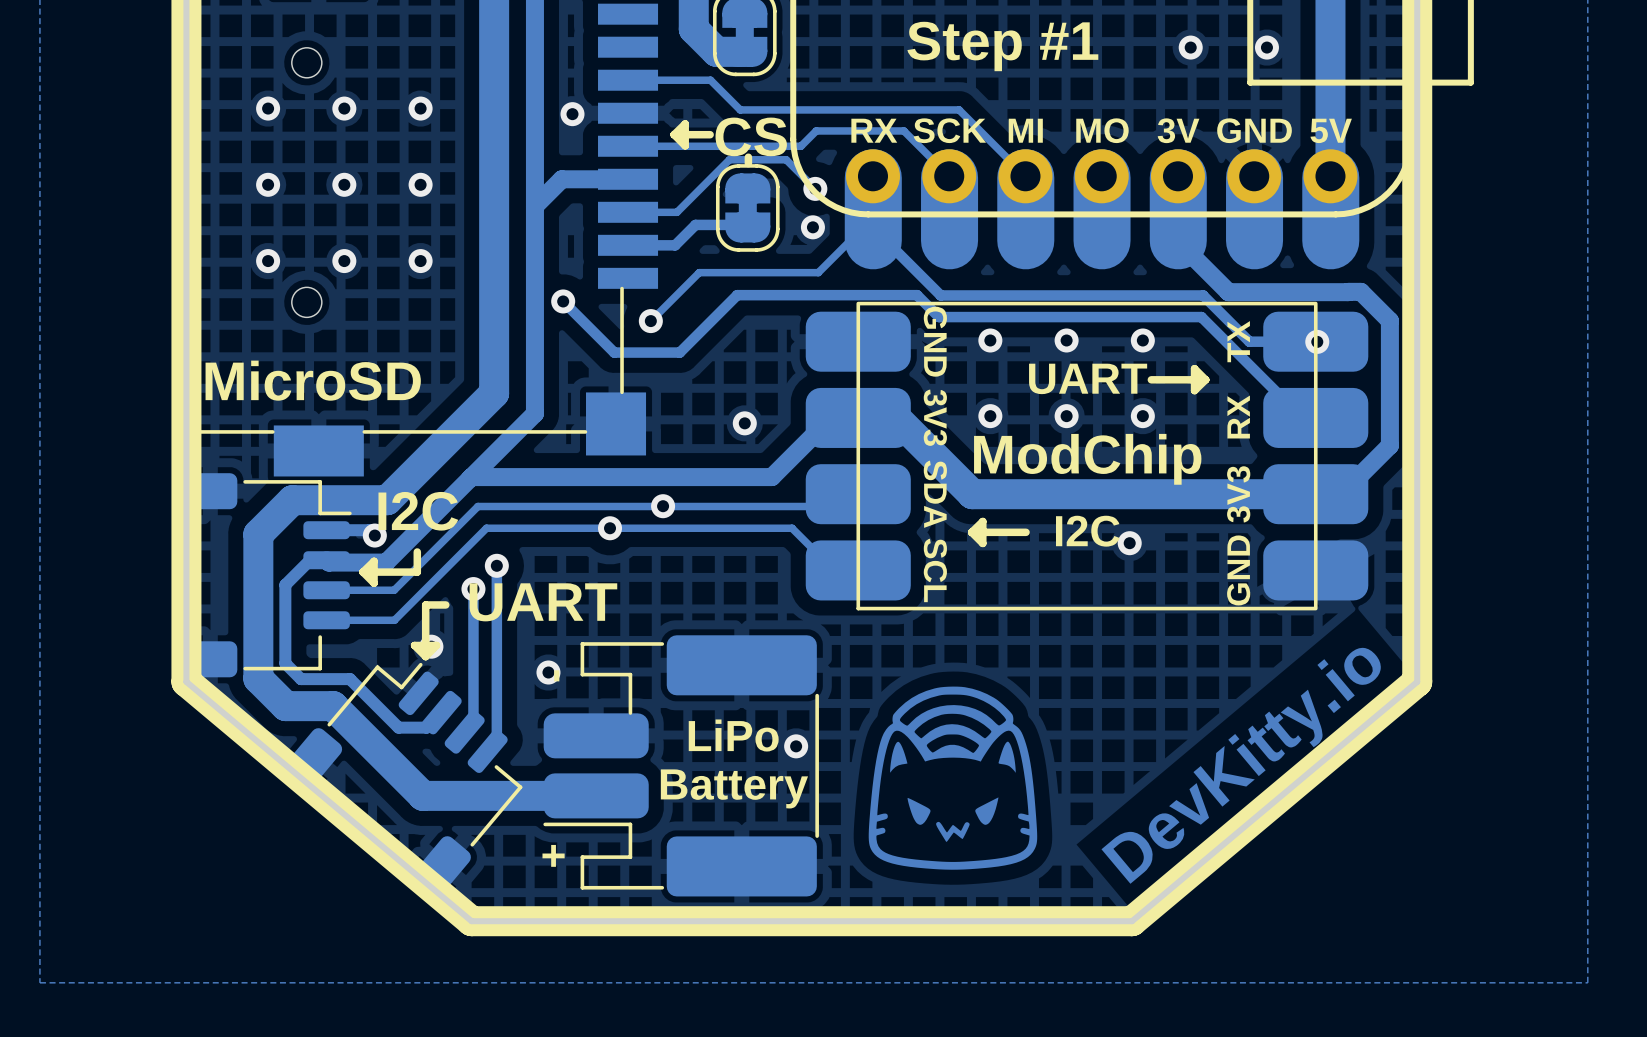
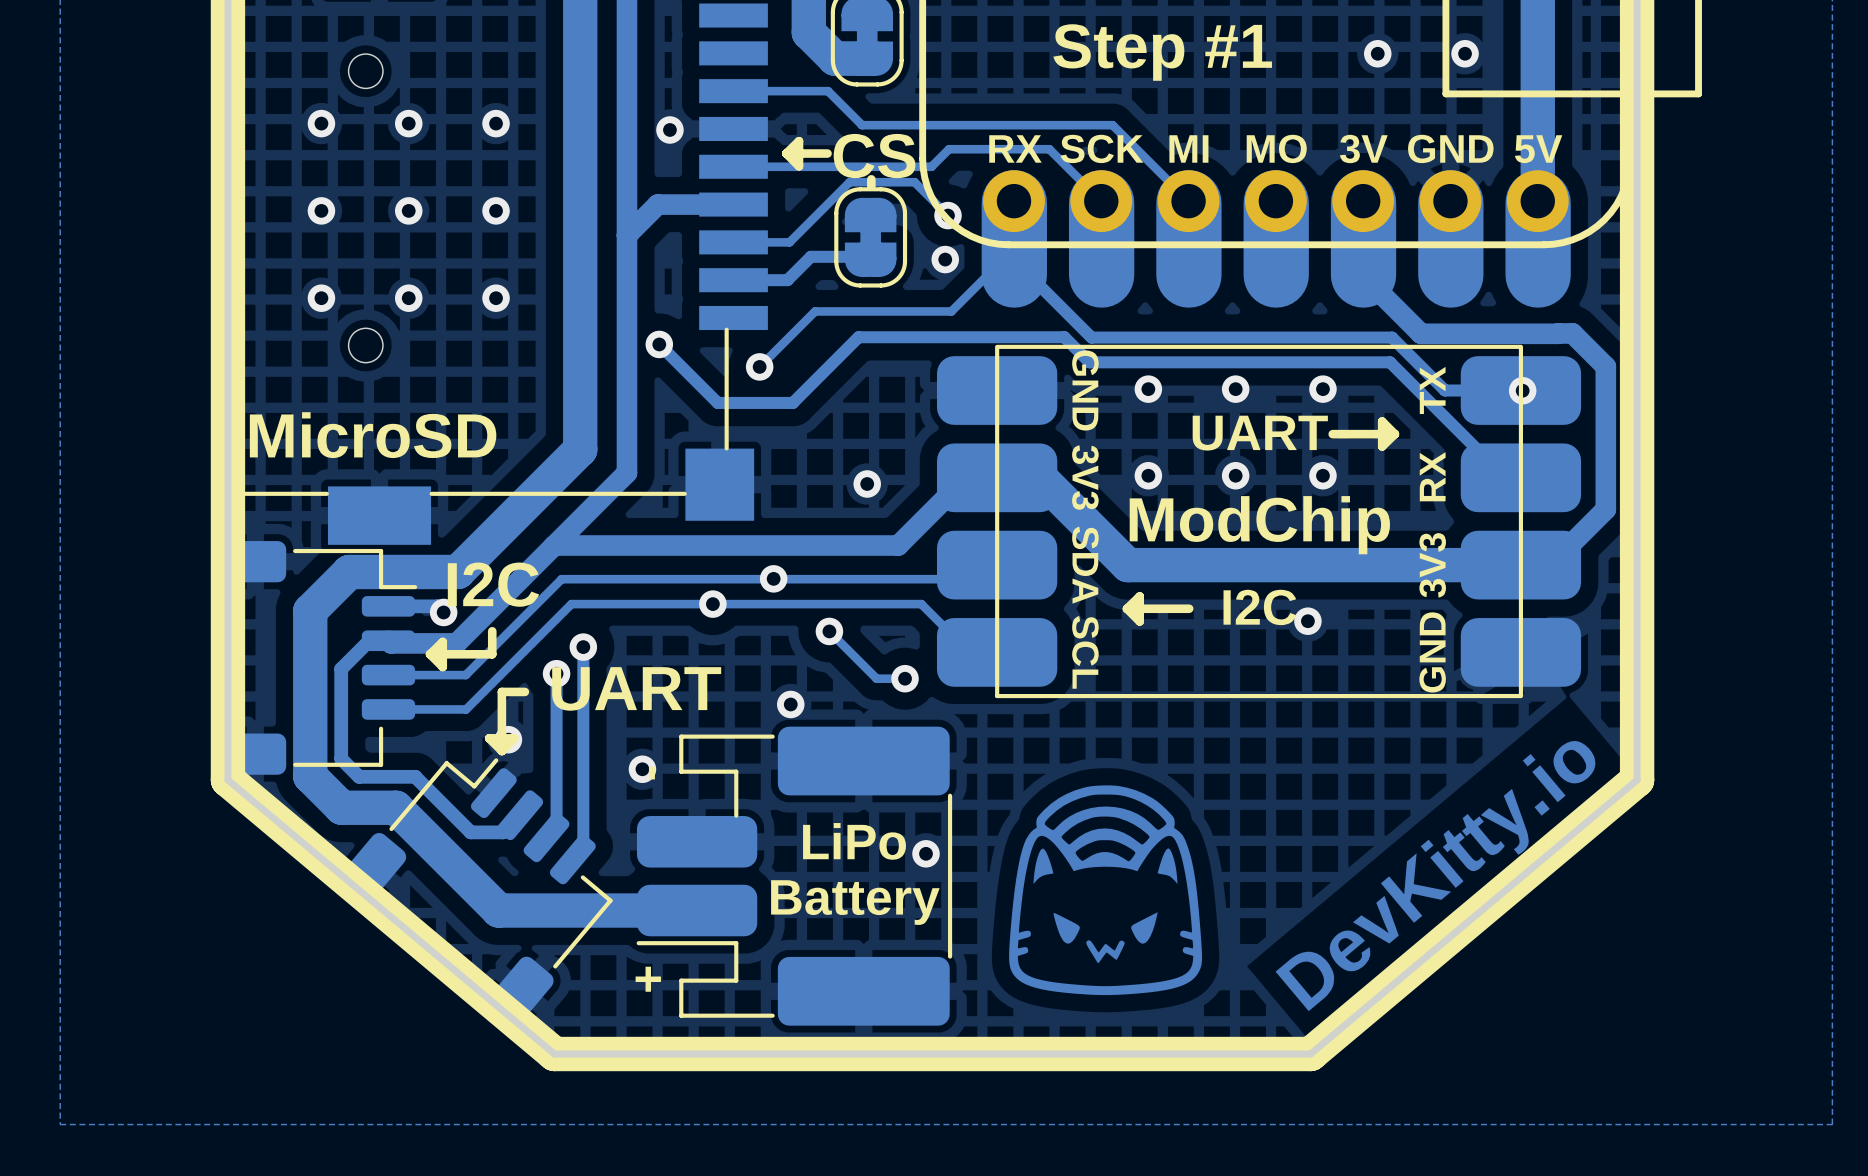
track: none -> (829, 631) (876, 678) (905, 678)
via: none -> (829, 631)
via: none -> (905, 678)
via: none -> (790, 704)

